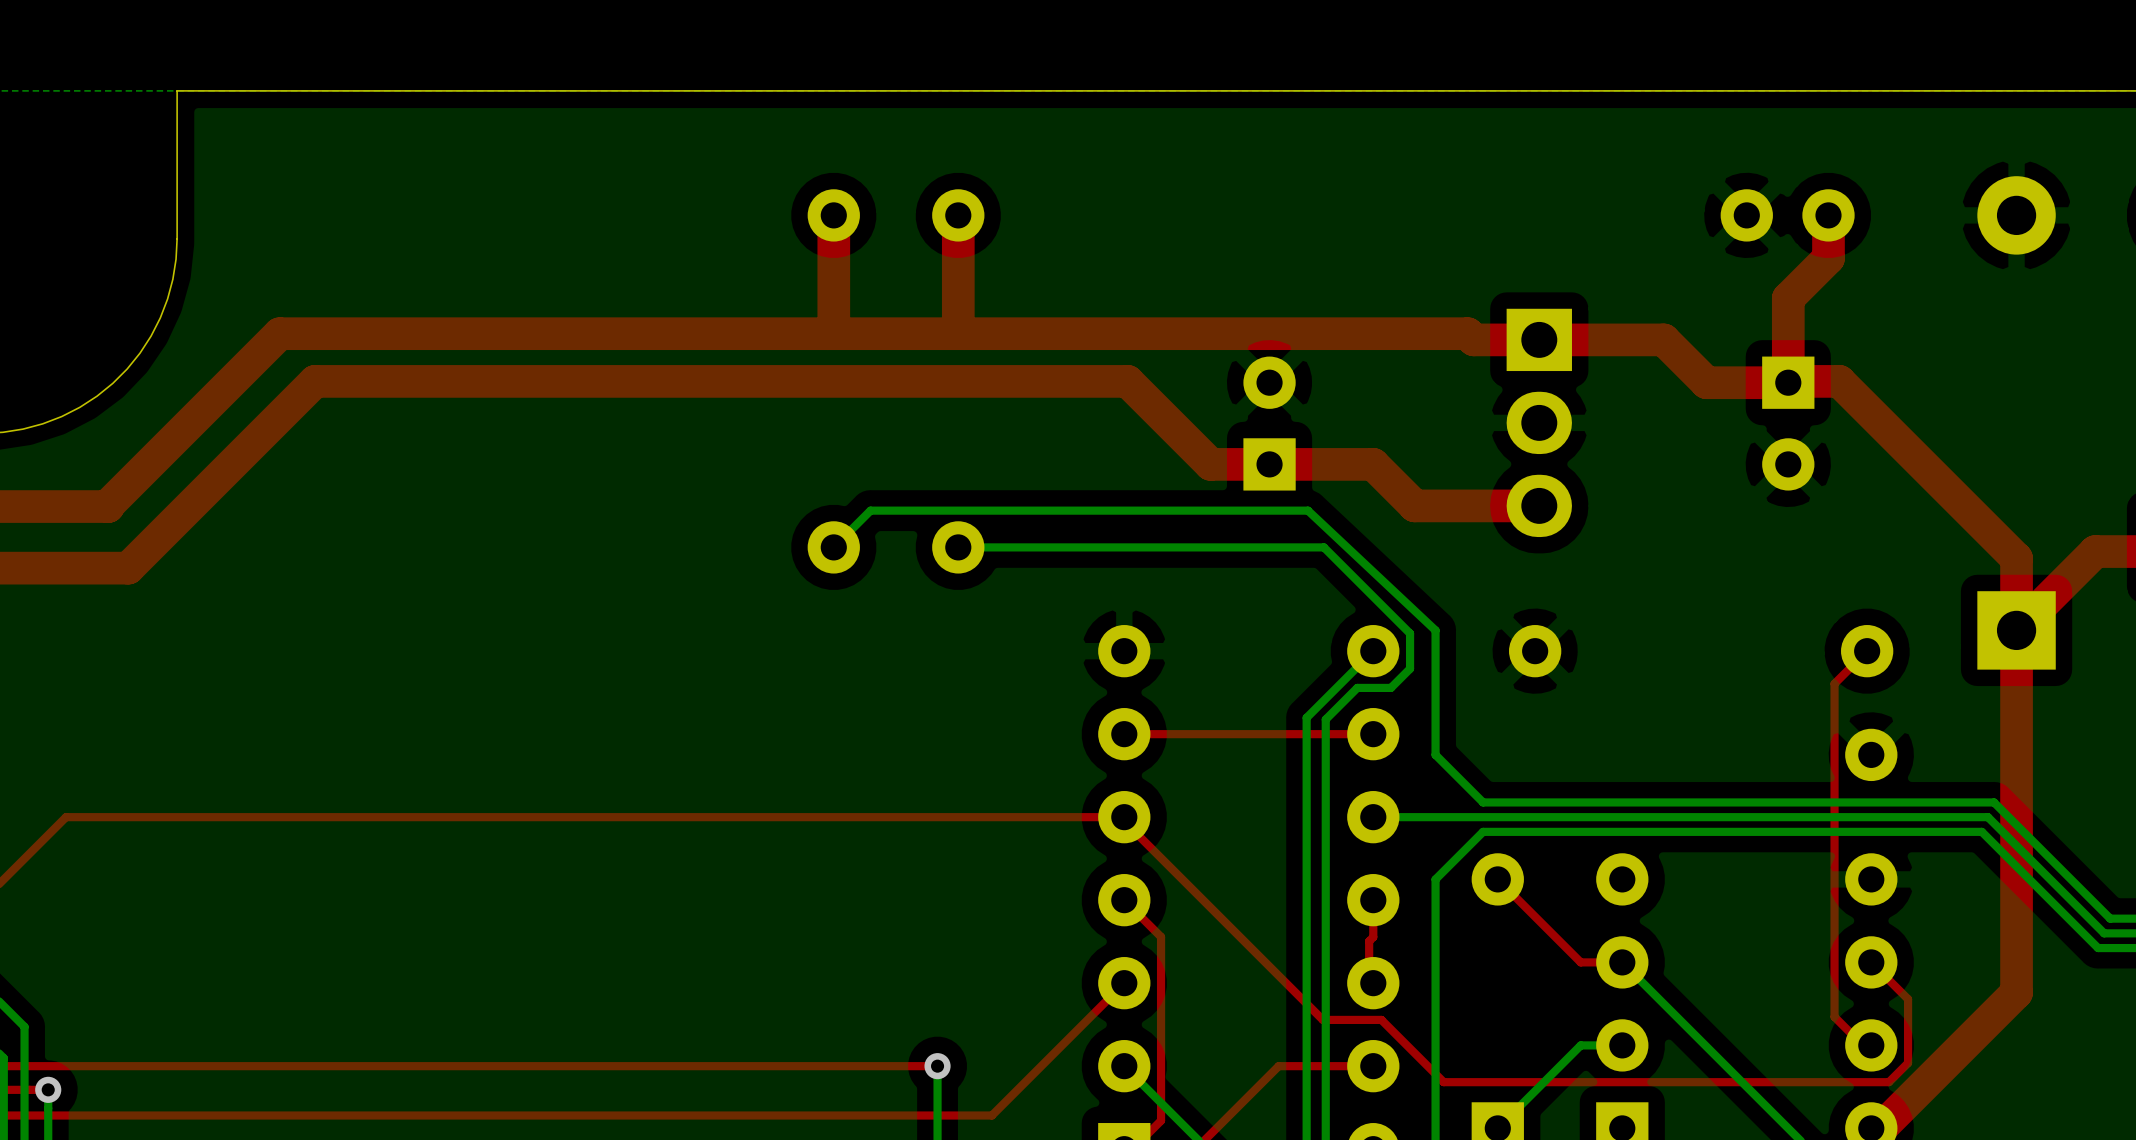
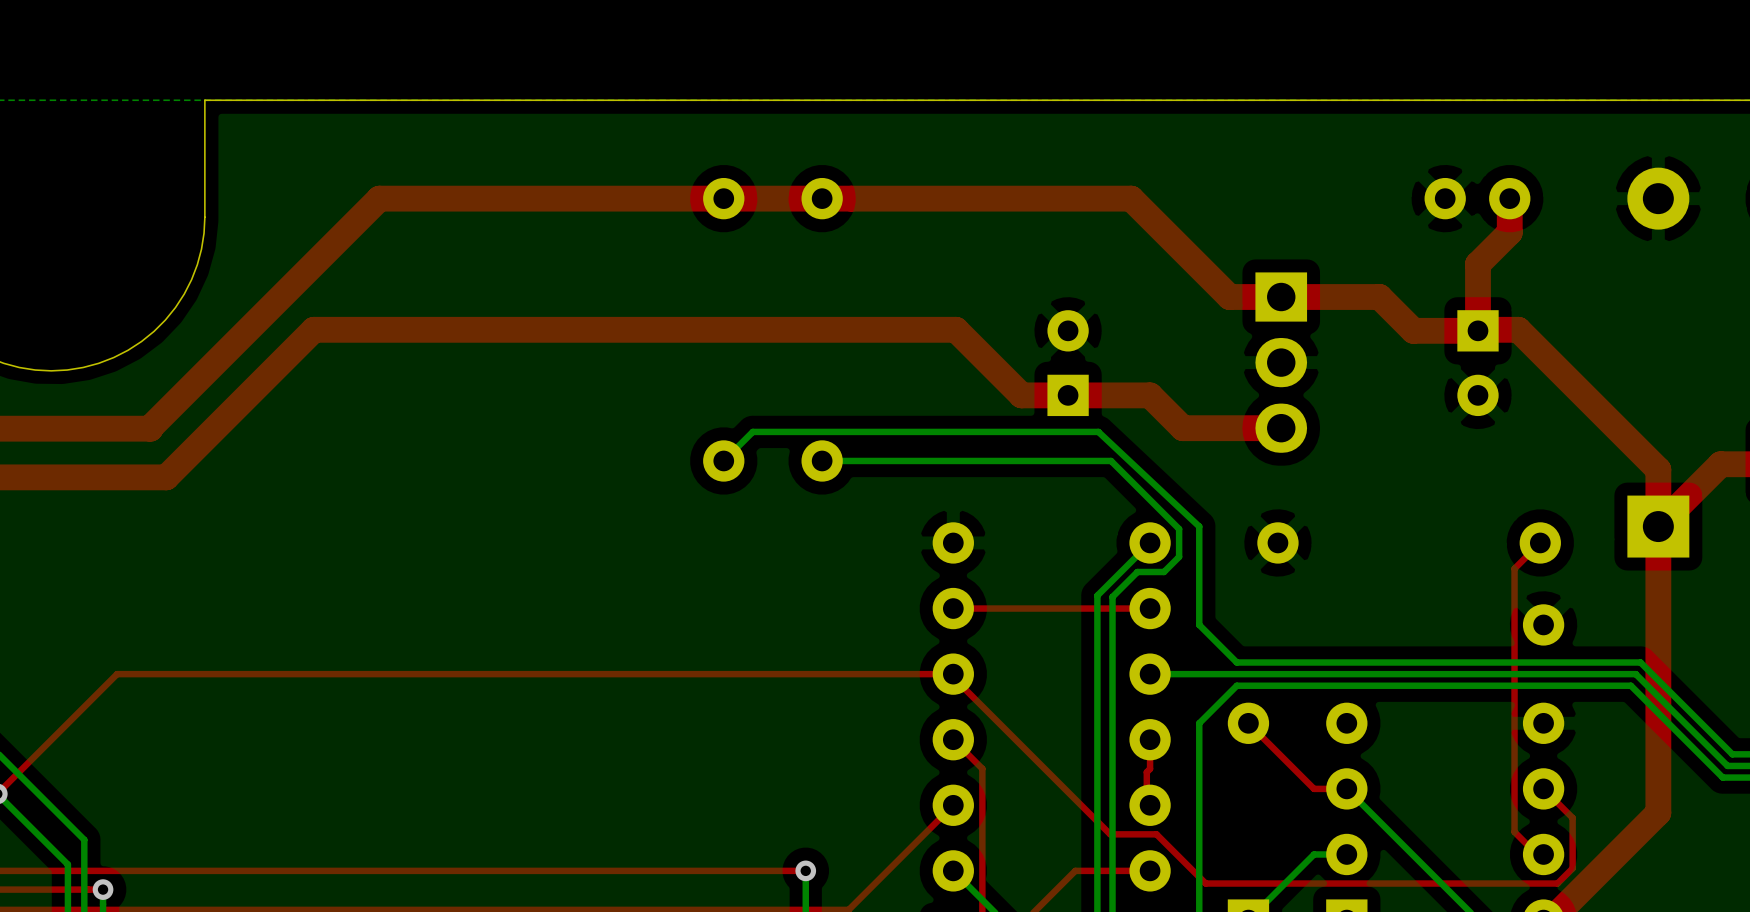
top track: (833, 215) (833, 327) (827, 333) -> none
top track: (958, 215) (958, 327) (964, 333) -> none
top track: none -> (718, 205) (712, 198) (379, 198) (285, 292)
top track: (1467, 333) (279, 333) -> (1224, 292) (1131, 198) (723, 198)

